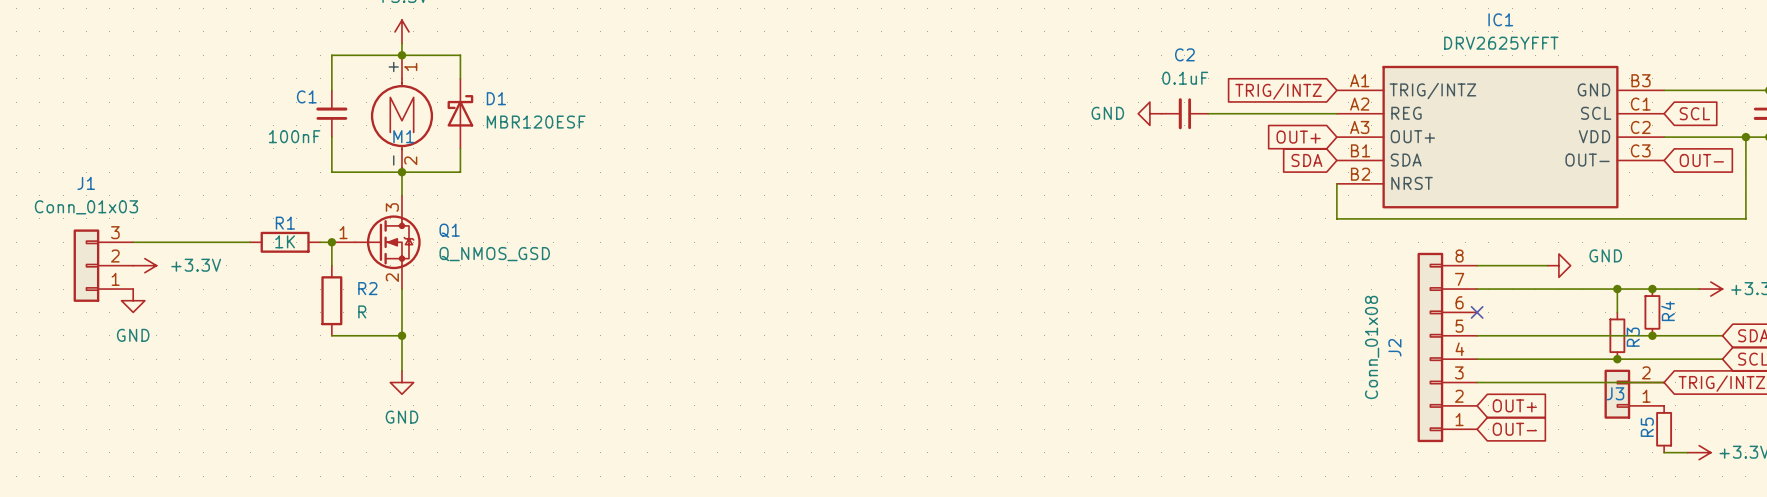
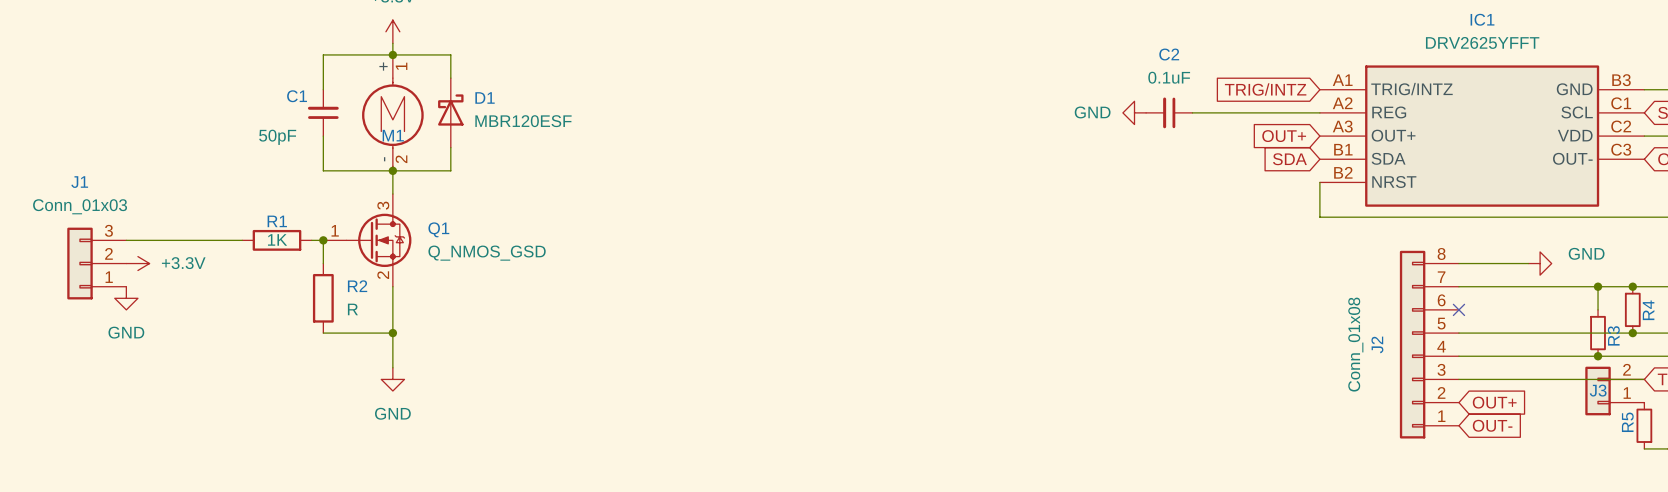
C1 value: 100nF (294, 136) -> 50pF (277, 137)

